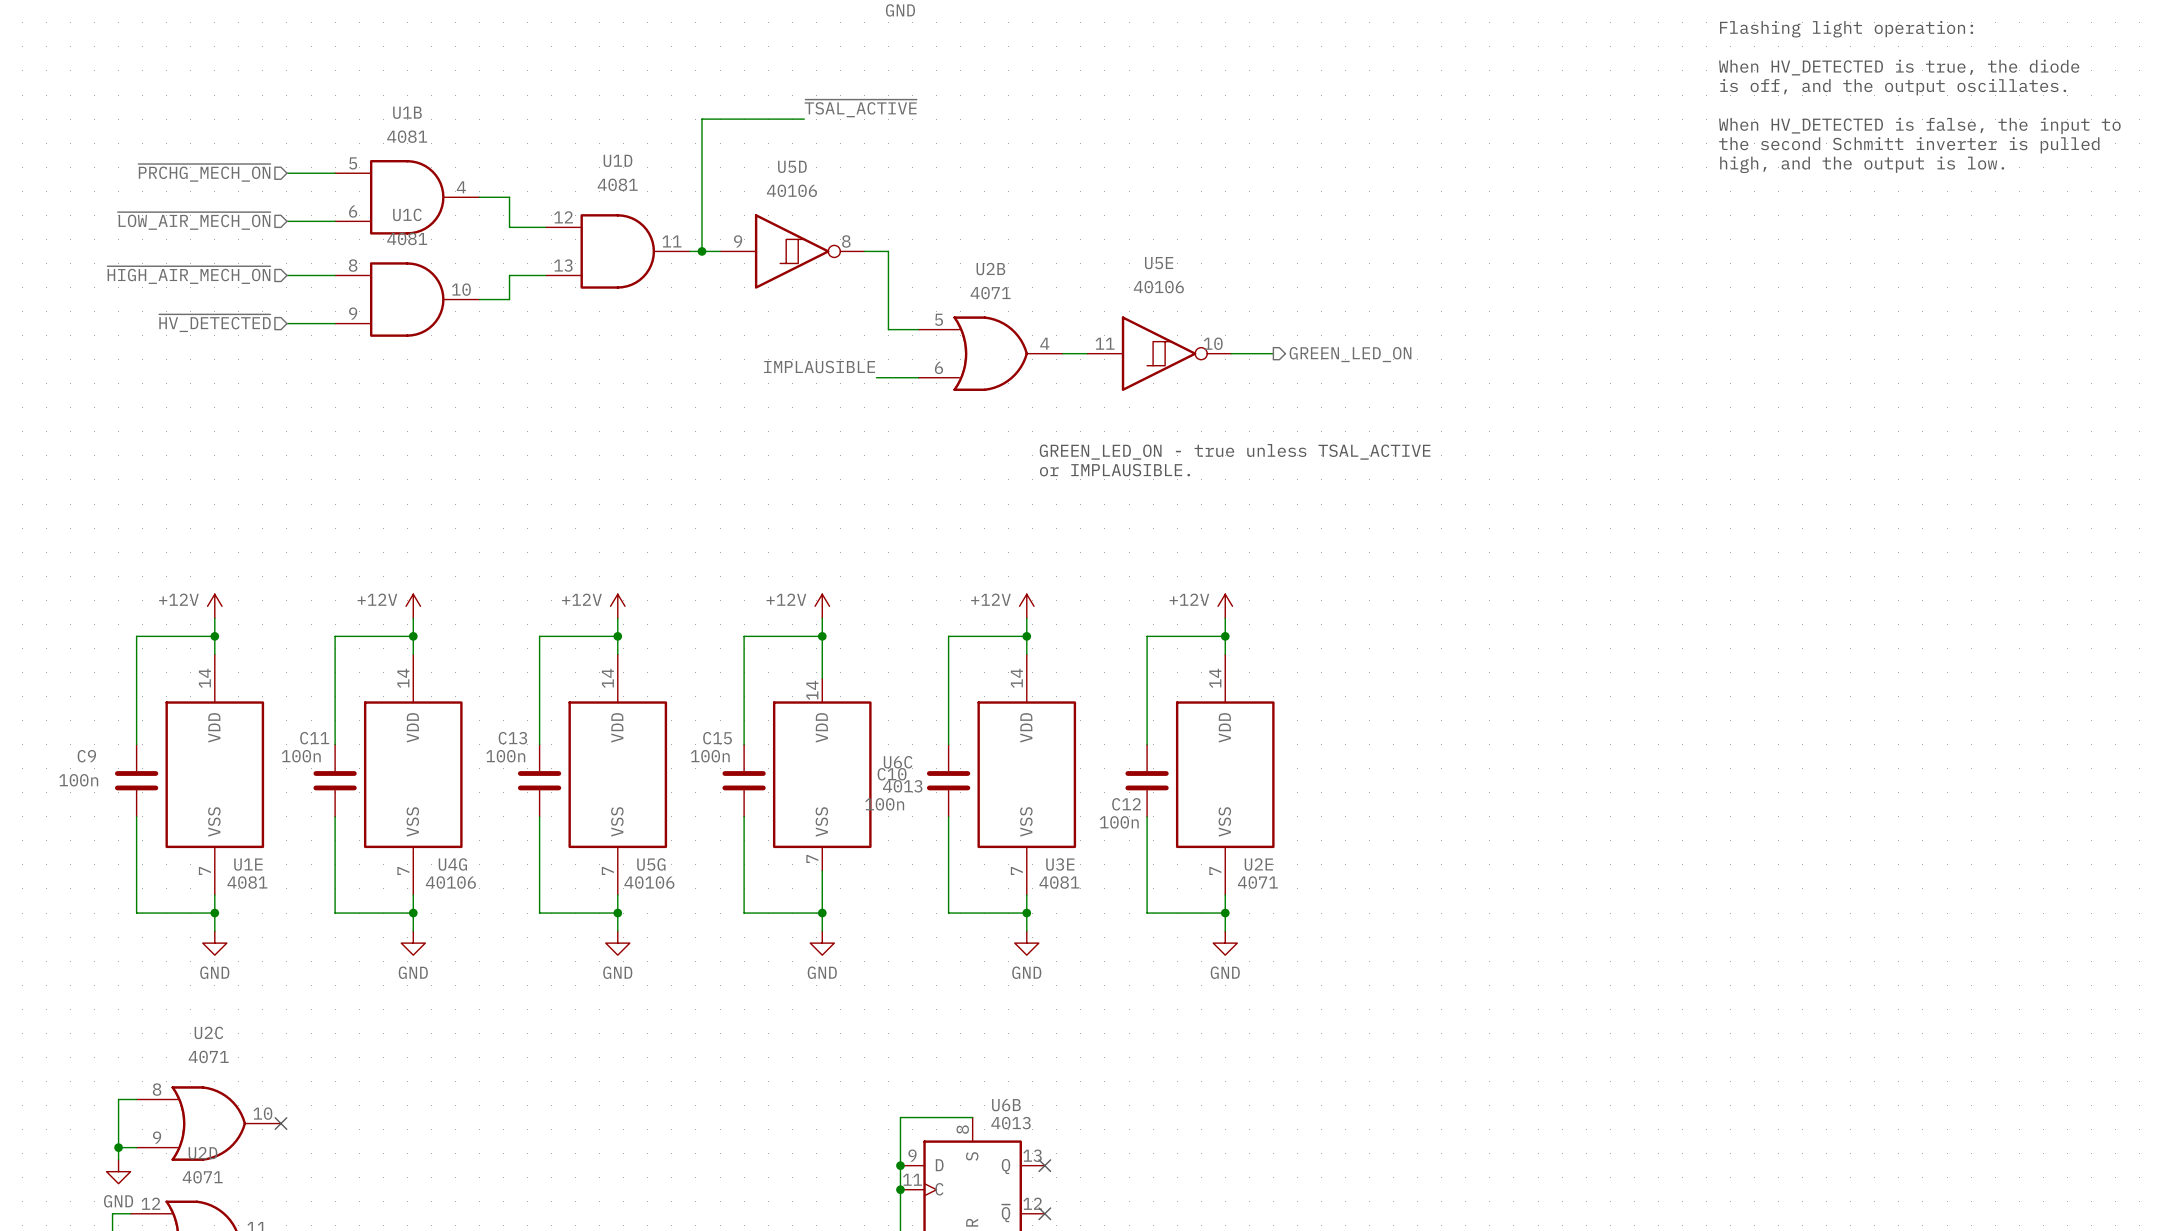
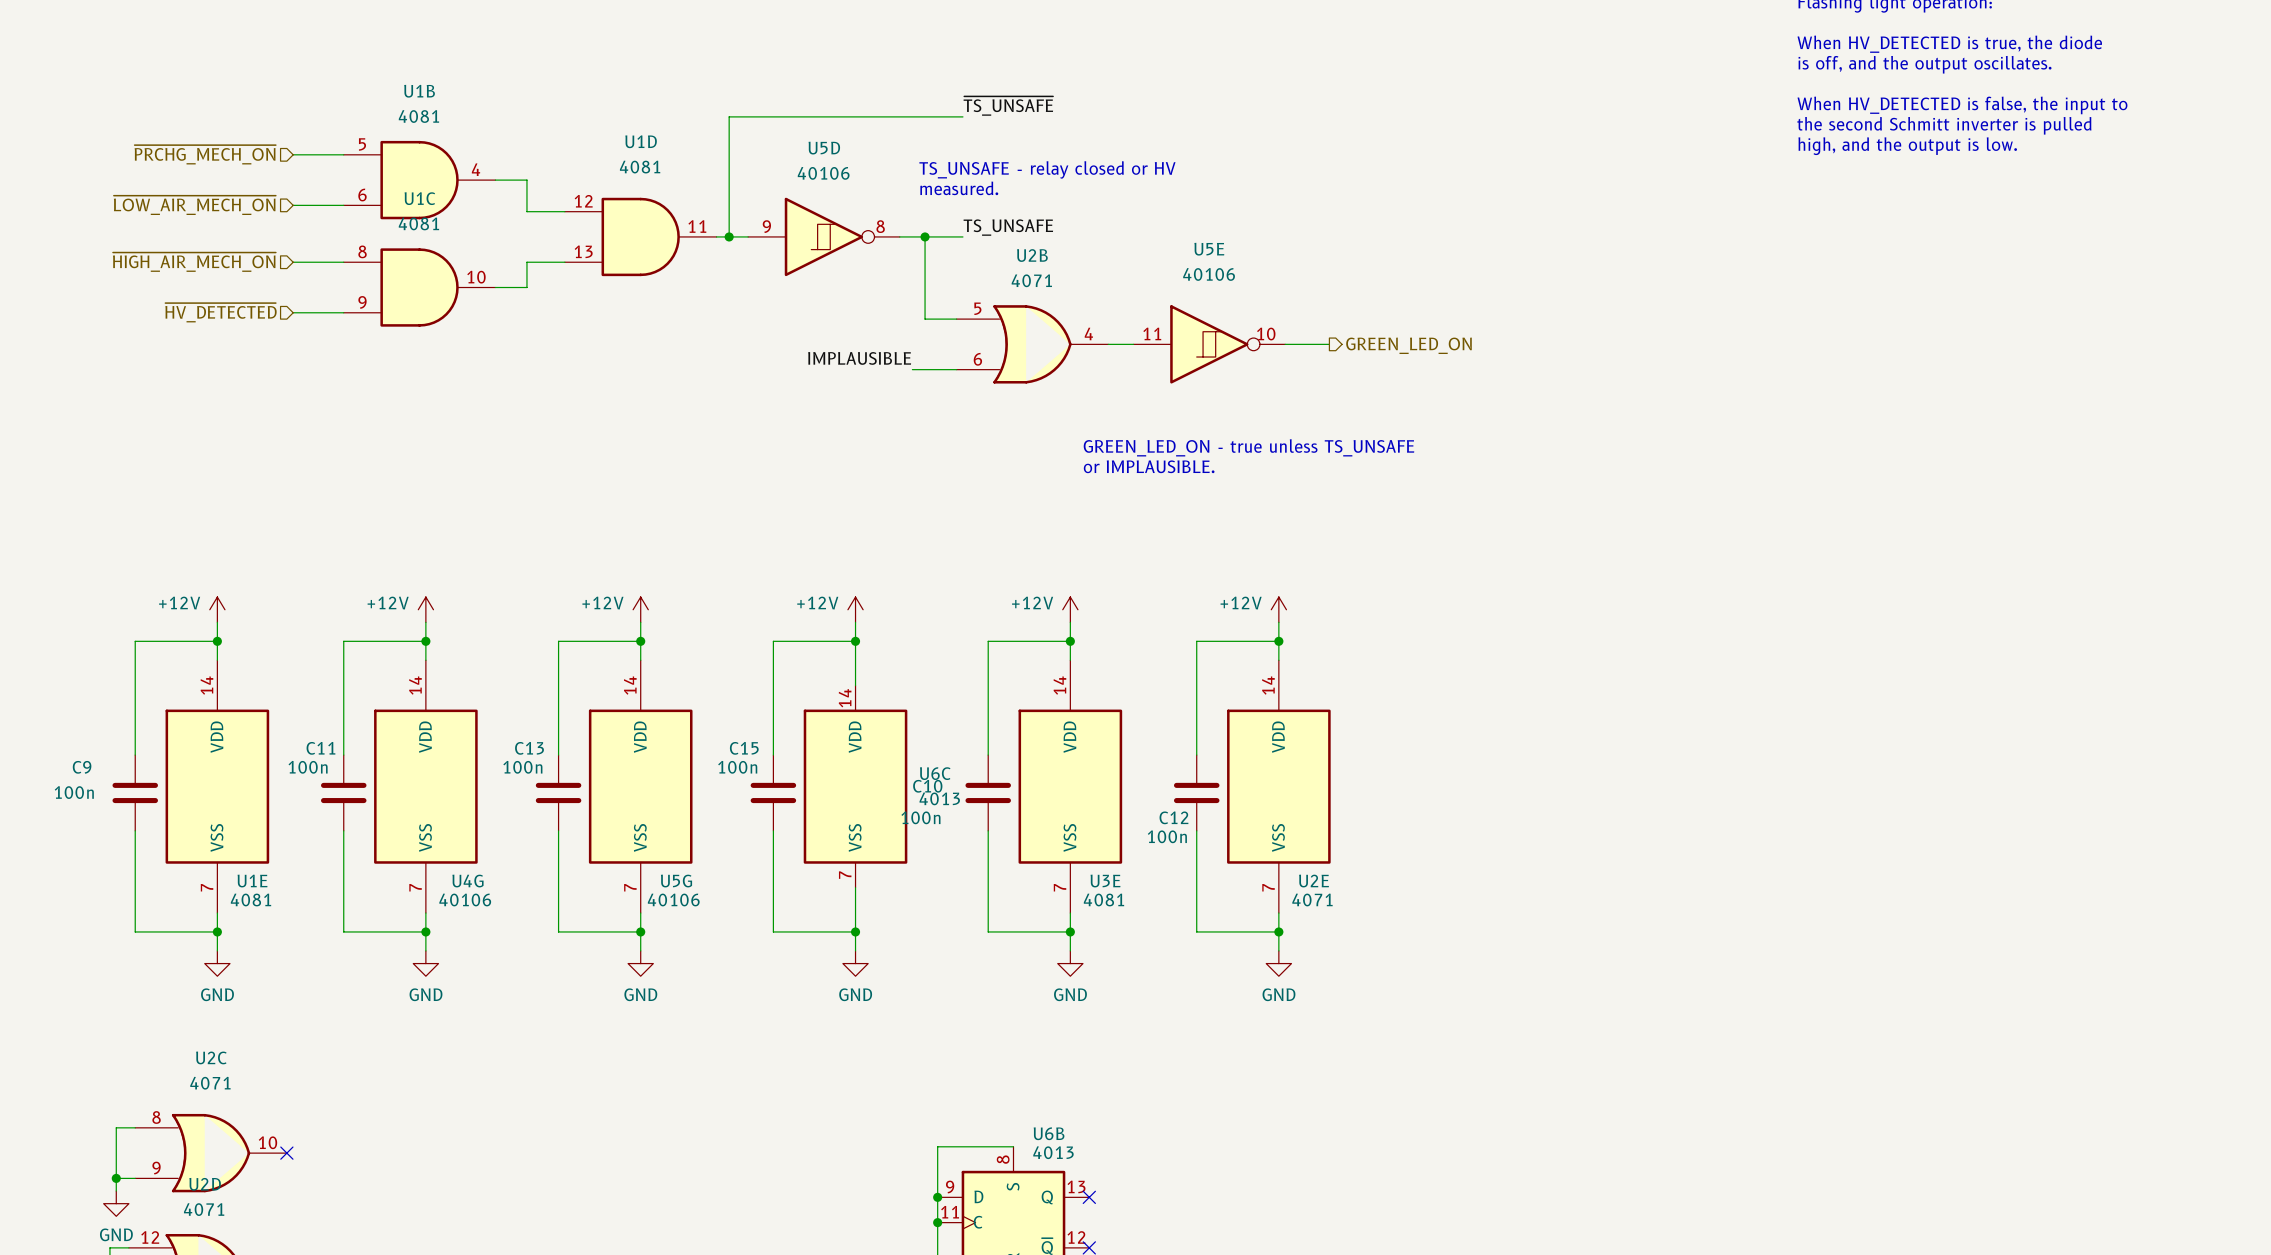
label: ~{TSAL_ACTIVE} (860, 108) -> none
wire: (804, 119) (701, 119) (701, 137) -> (962, 116) (729, 116)
label: none -> ~{TS_UNSAFE} (1008, 106)
text: none -> TS_UNSAFE - relay closed or HV (1047, 169)
text: none -> measured. (959, 188)
label: none -> TS_UNSAFE (1008, 227)
wire: none -> (925, 236) (962, 236)
junction: none -> (925, 236)
text: GREEN_LED_ON - true unless TSAL_ACTIVE (1235, 451) -> GREEN_LED_ON - true unless TS_UNSAFE (1248, 447)

